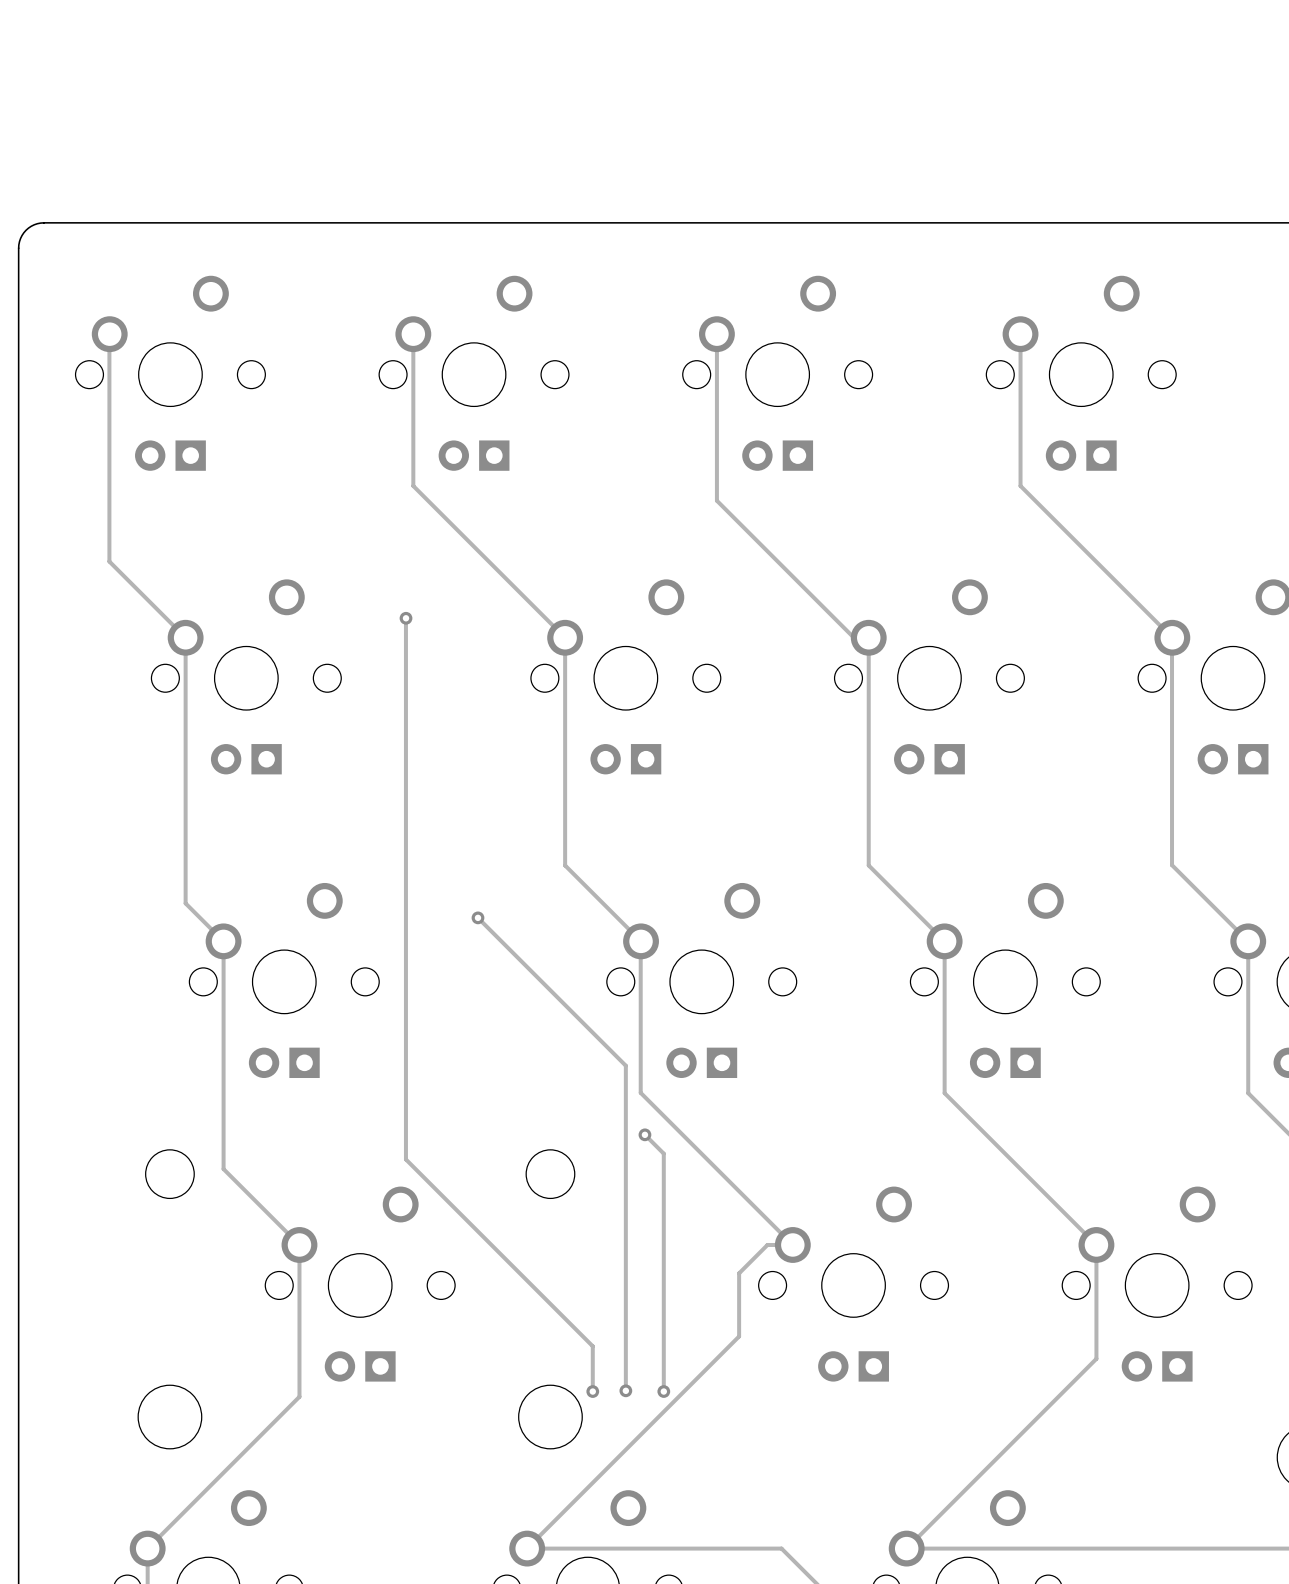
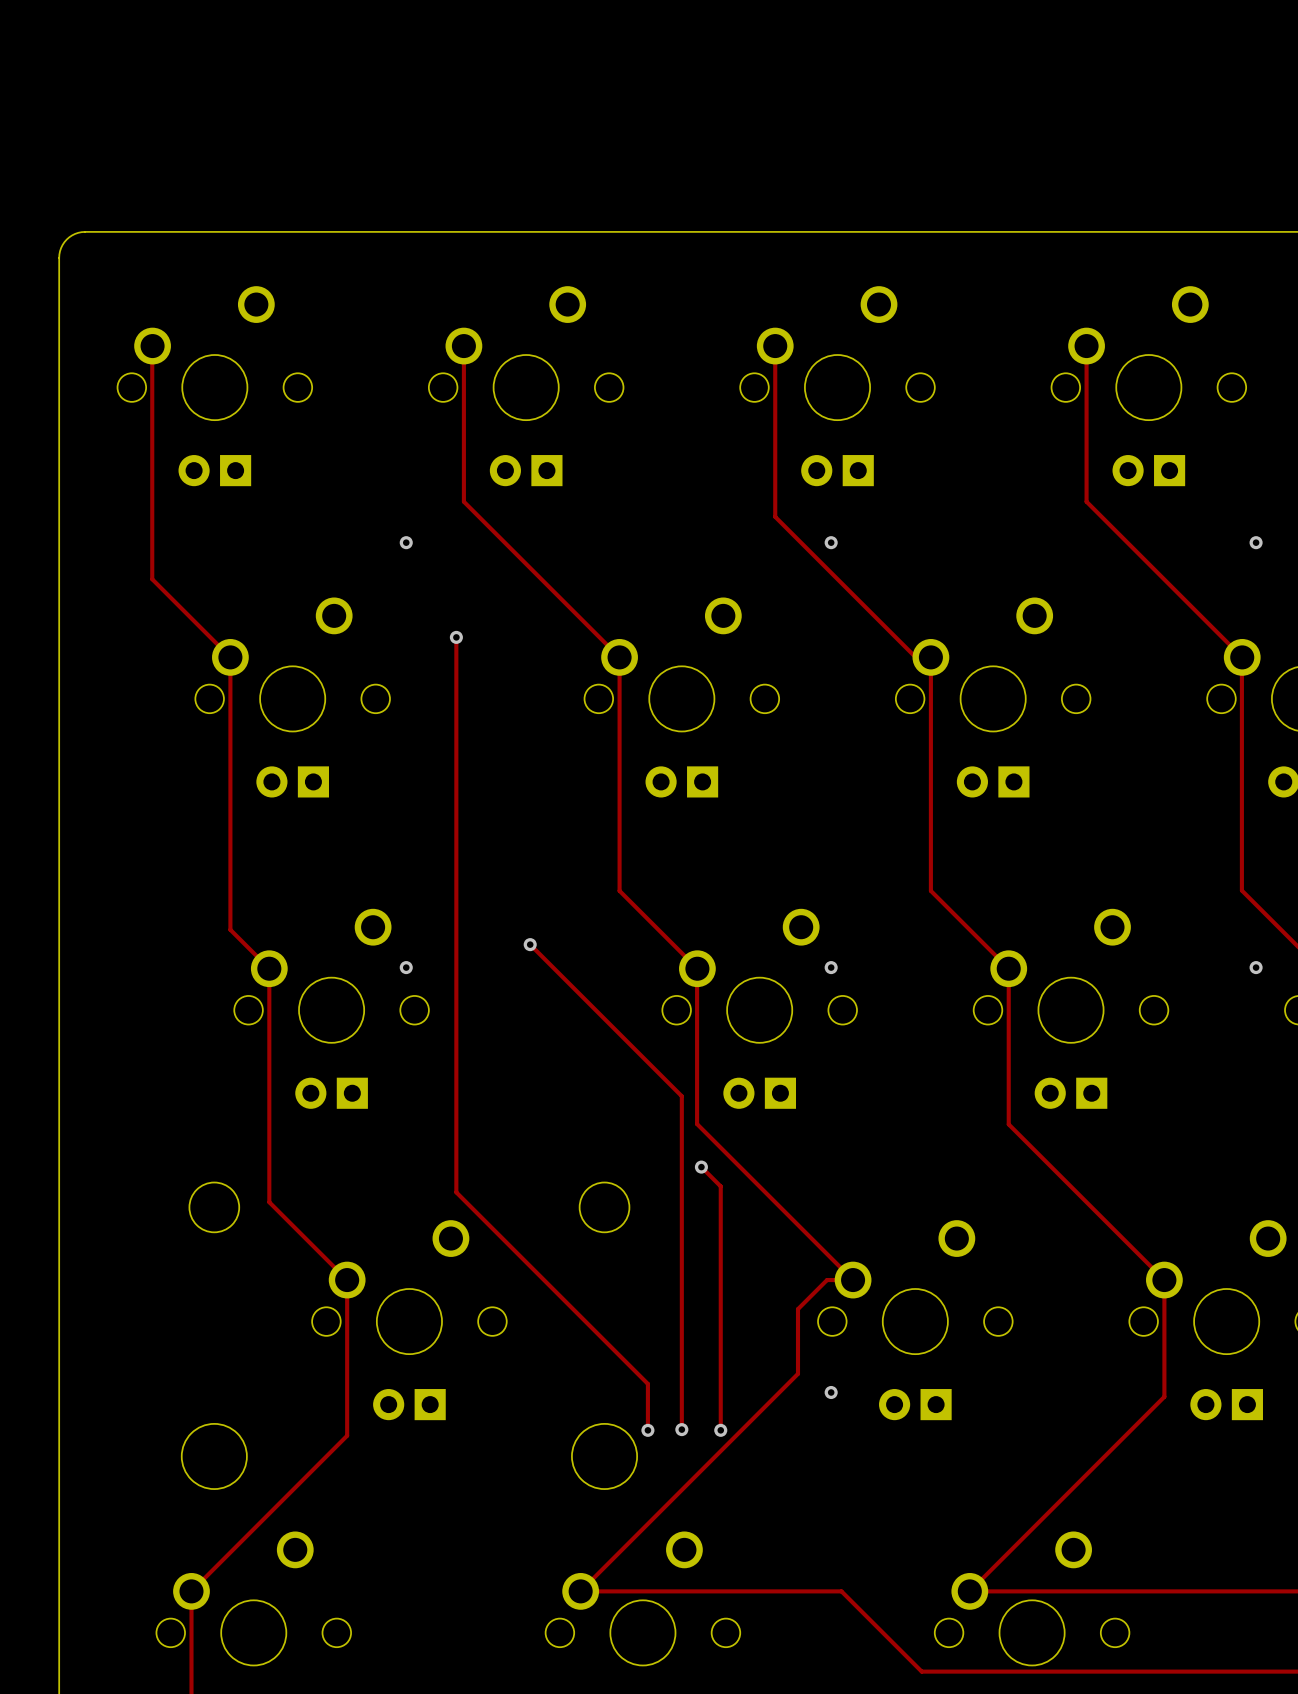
via: none -> (406, 542)
via: none -> (831, 542)
via: none -> (1256, 542)
via: none -> (406, 967)
via: none -> (831, 967)
via: none -> (1256, 967)
via: none -> (831, 1392)

